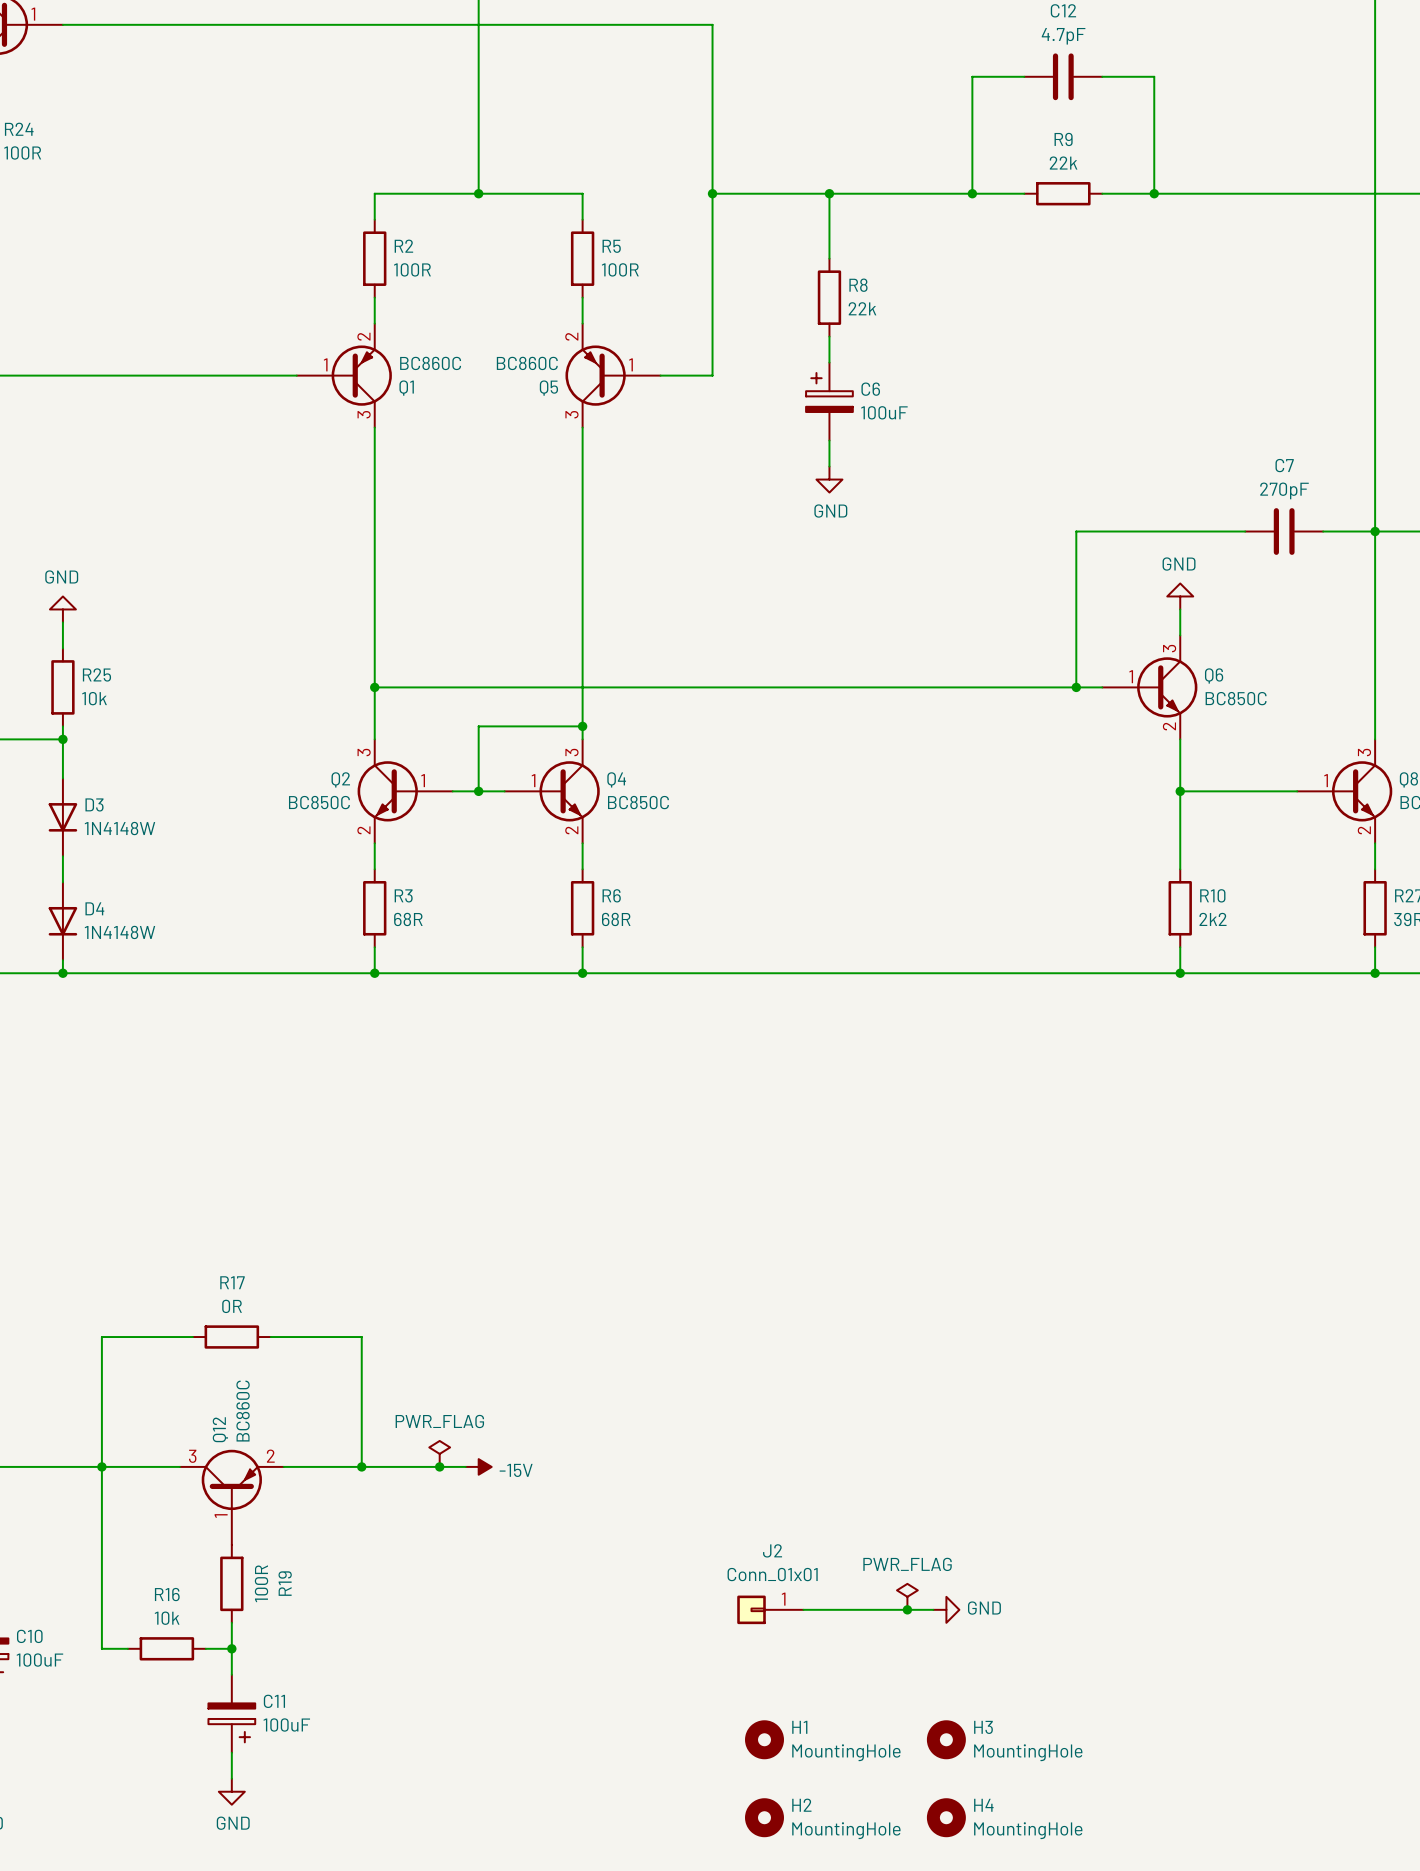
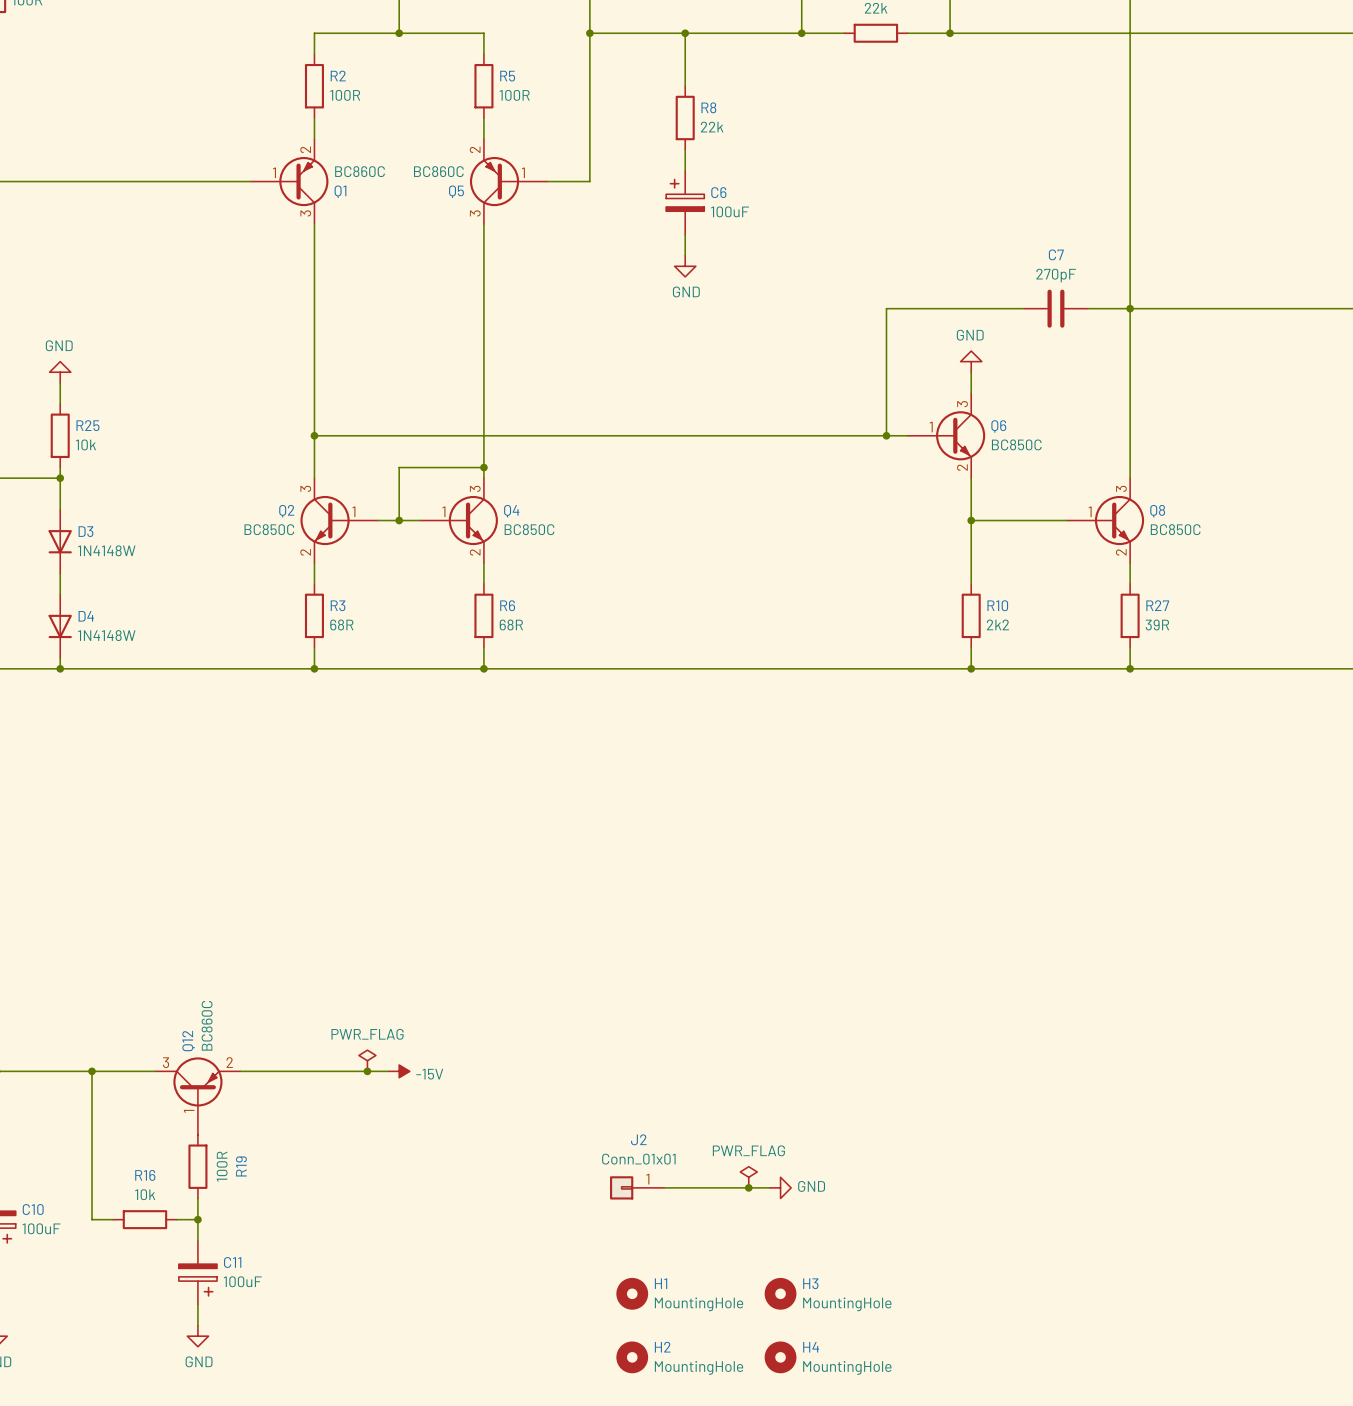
wire: (192, 1337) (101, 1337) (101, 1466) -> none
R17: 0R (231, 1337) -> none
wire: (270, 1337) (361, 1337) (361, 1466) -> none
junction: (361, 1466) -> none

